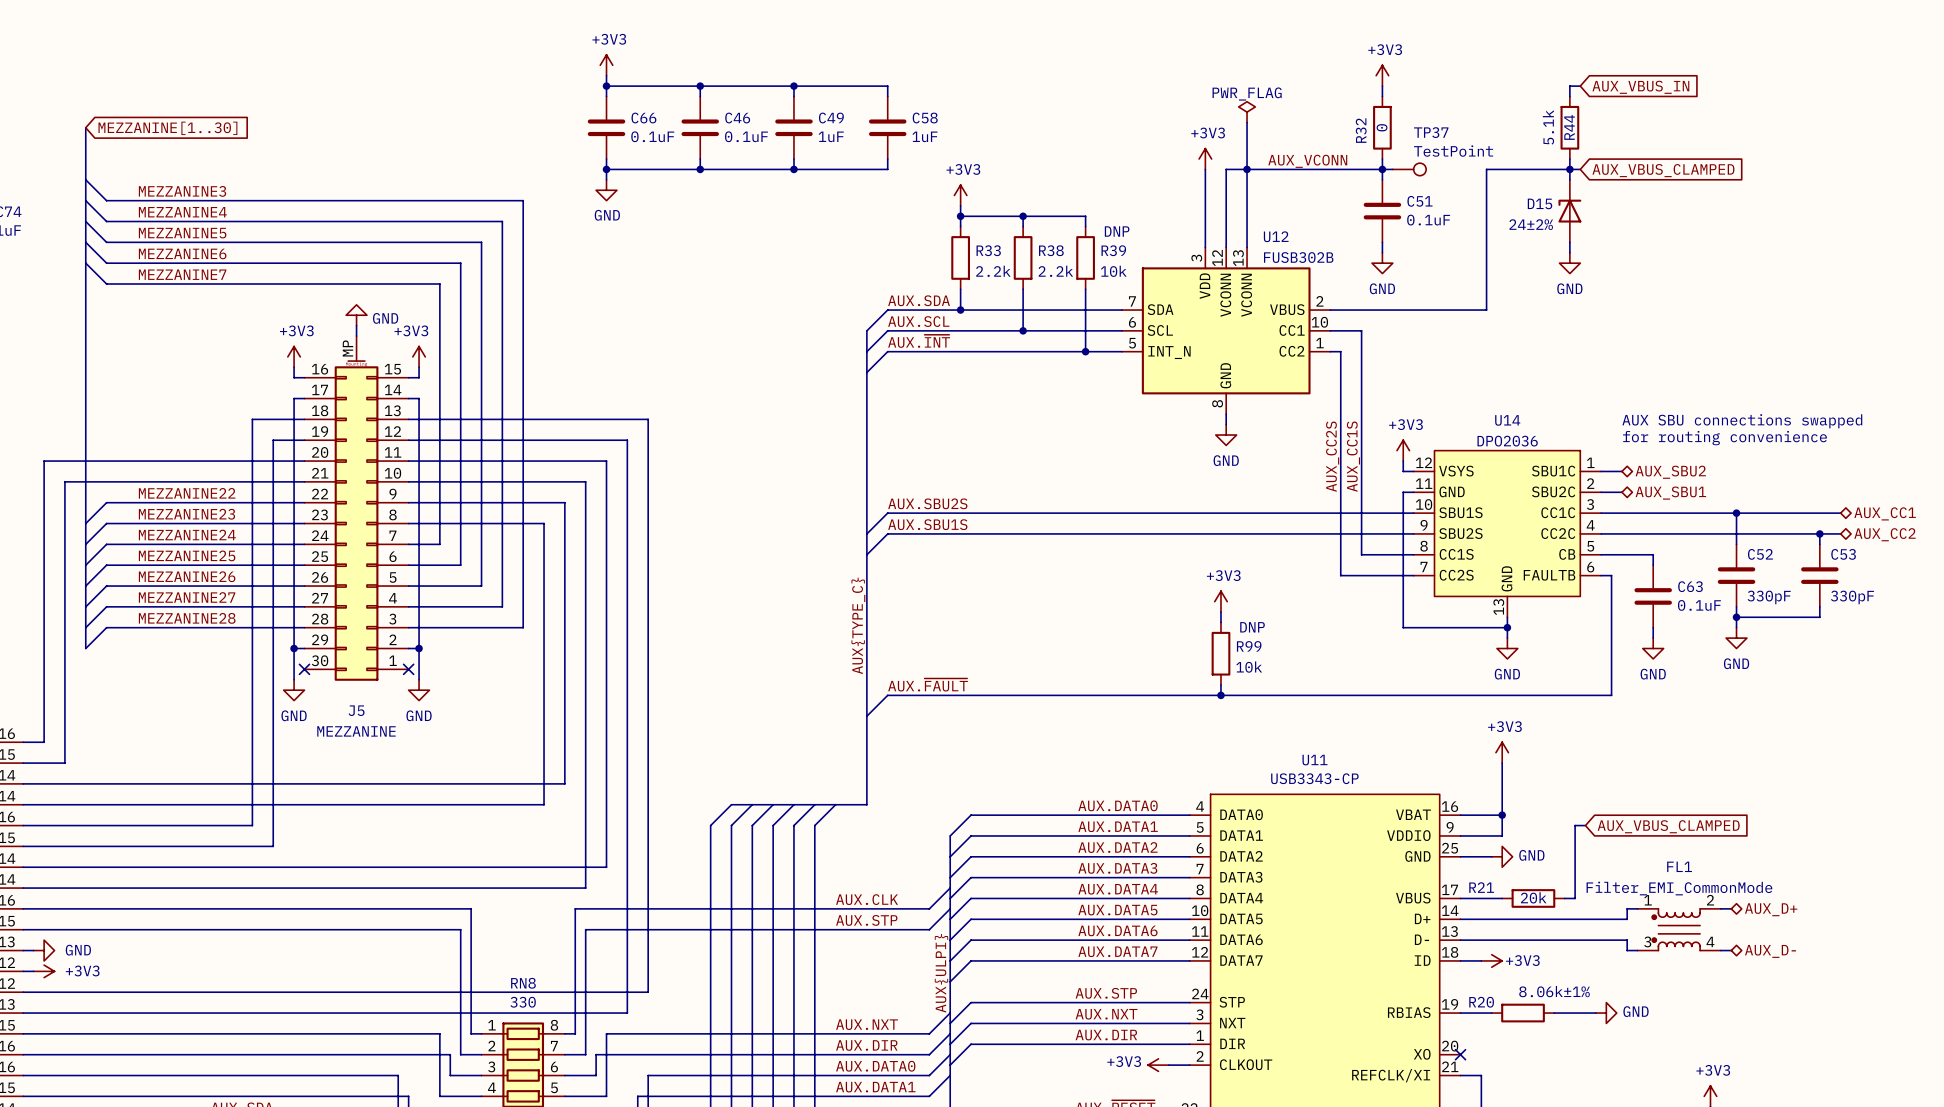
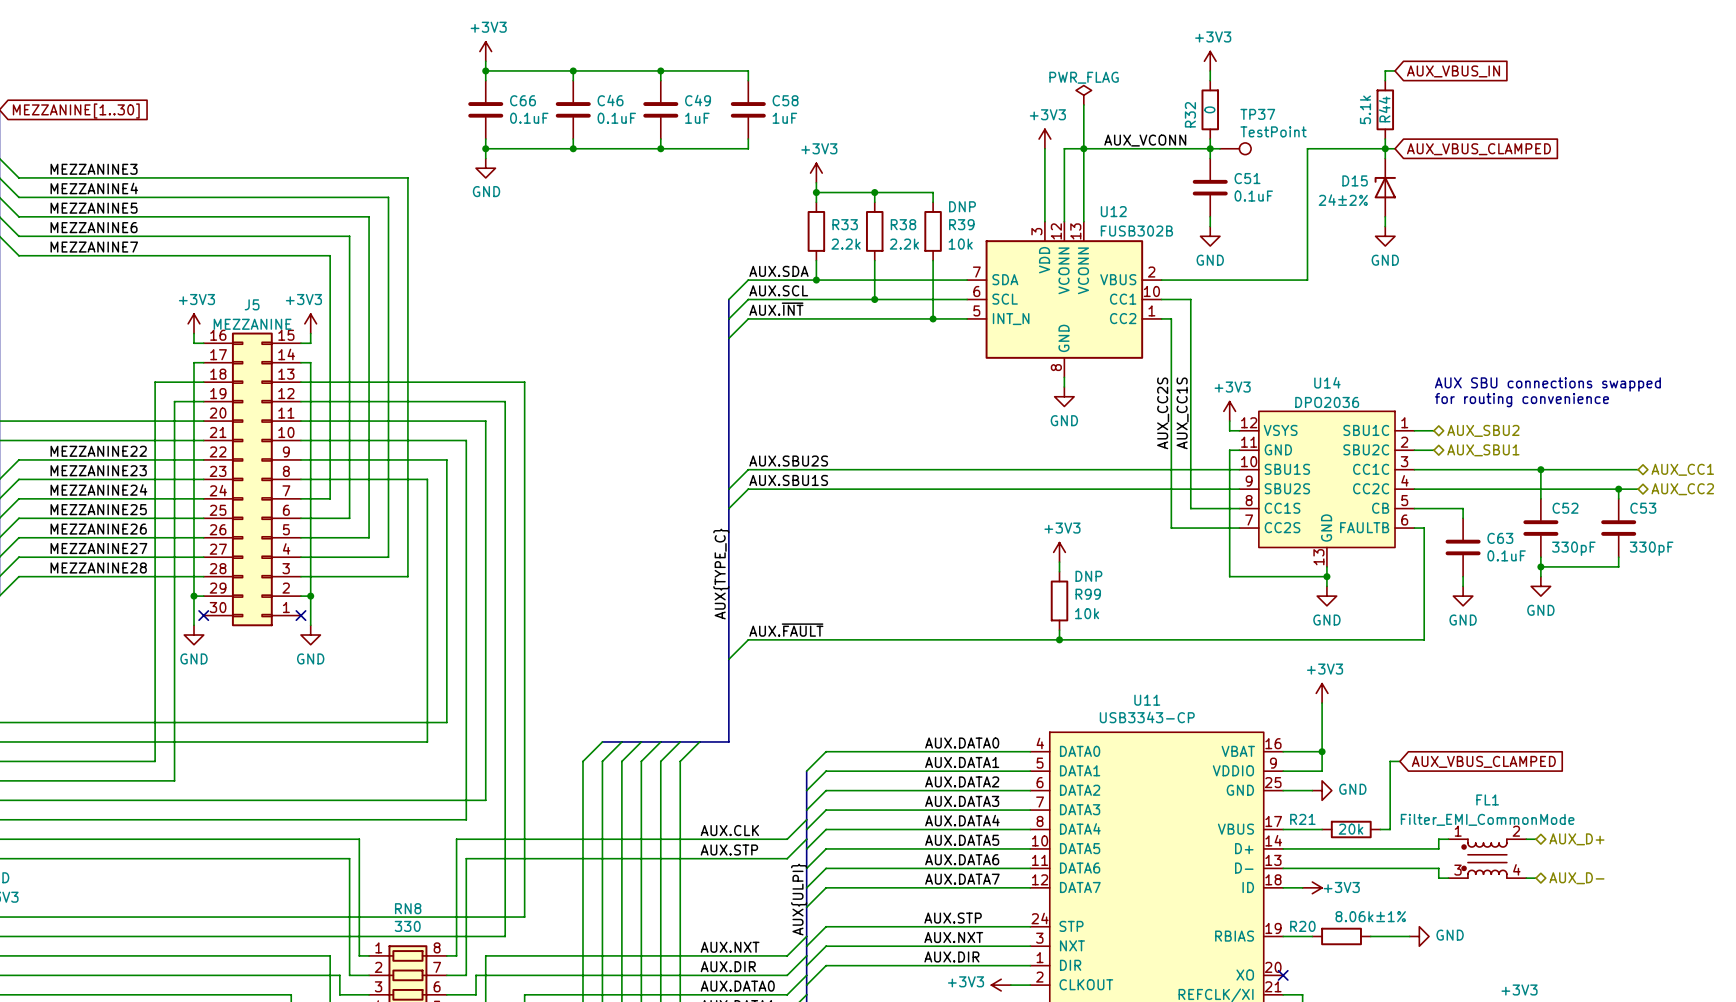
power symbol: GND (356, 315) -> none
wire: (356, 325) (356, 336) -> none
J5 symbol: [304, 336, 409, 681] -> [203, 332, 301, 627]
J5 name position: J5 (356, 710) -> J5 (252, 304)
J5 value position: MEZZANINE (356, 731) -> MEZZANINE (252, 324)

